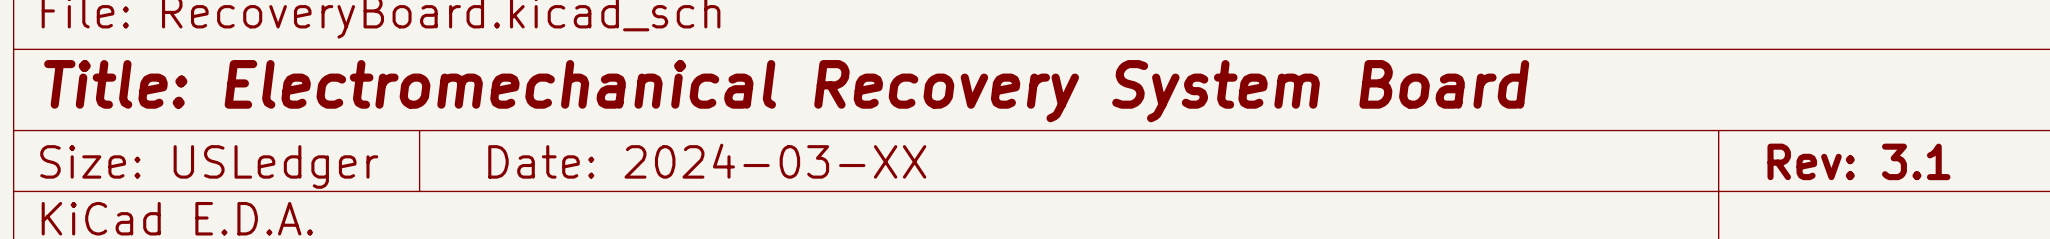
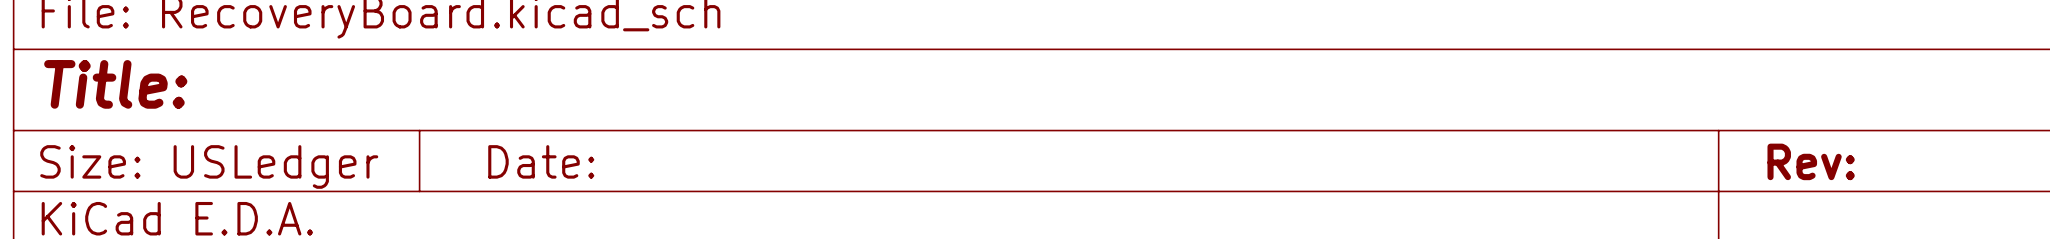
title block: Title: Electromechanical Recovery System Board (786, 91) -> Title: (115, 84)
title block: Date: 2024-03-XX (707, 161) -> Date: (541, 161)
title block: Rev: 3.1 (1858, 161) -> Rev: (1811, 161)

